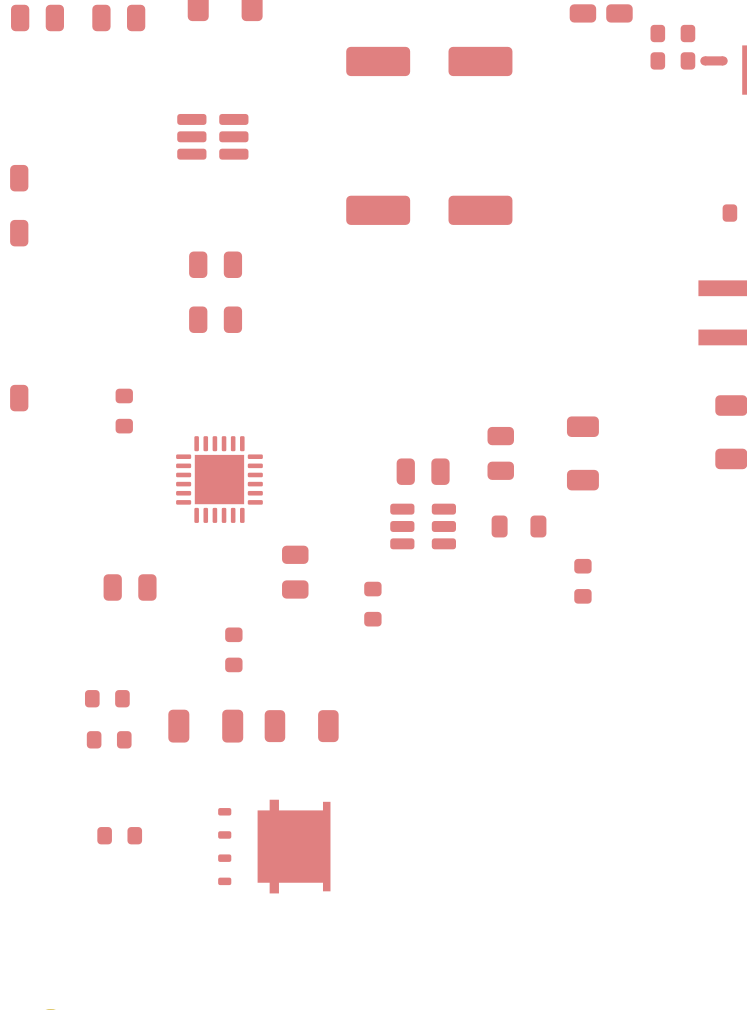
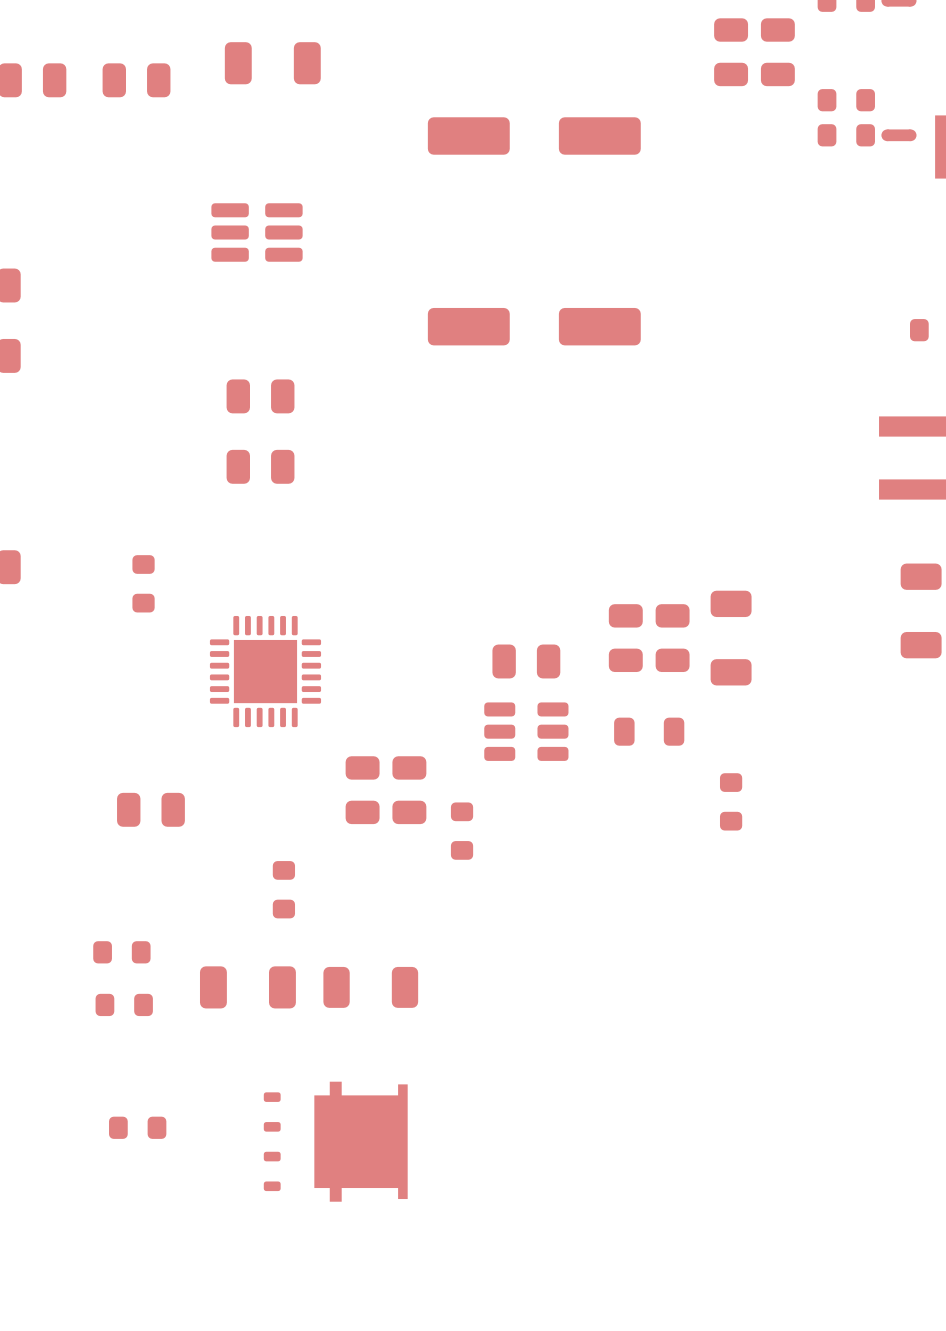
part: none -> (672, 638)
part: none -> (409, 790)

